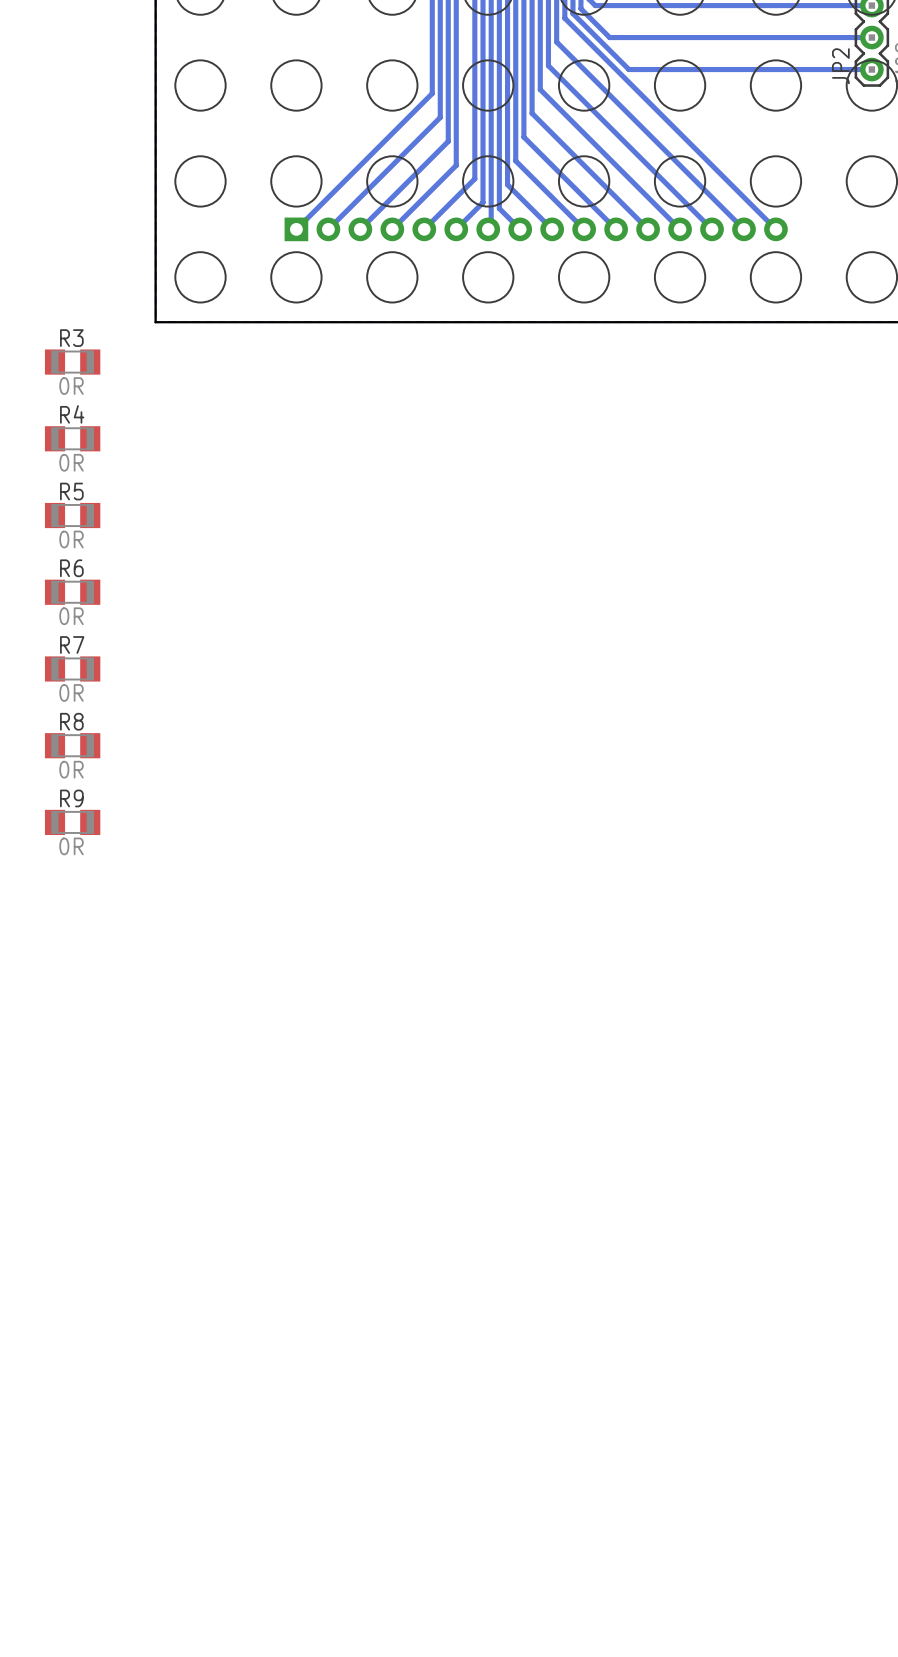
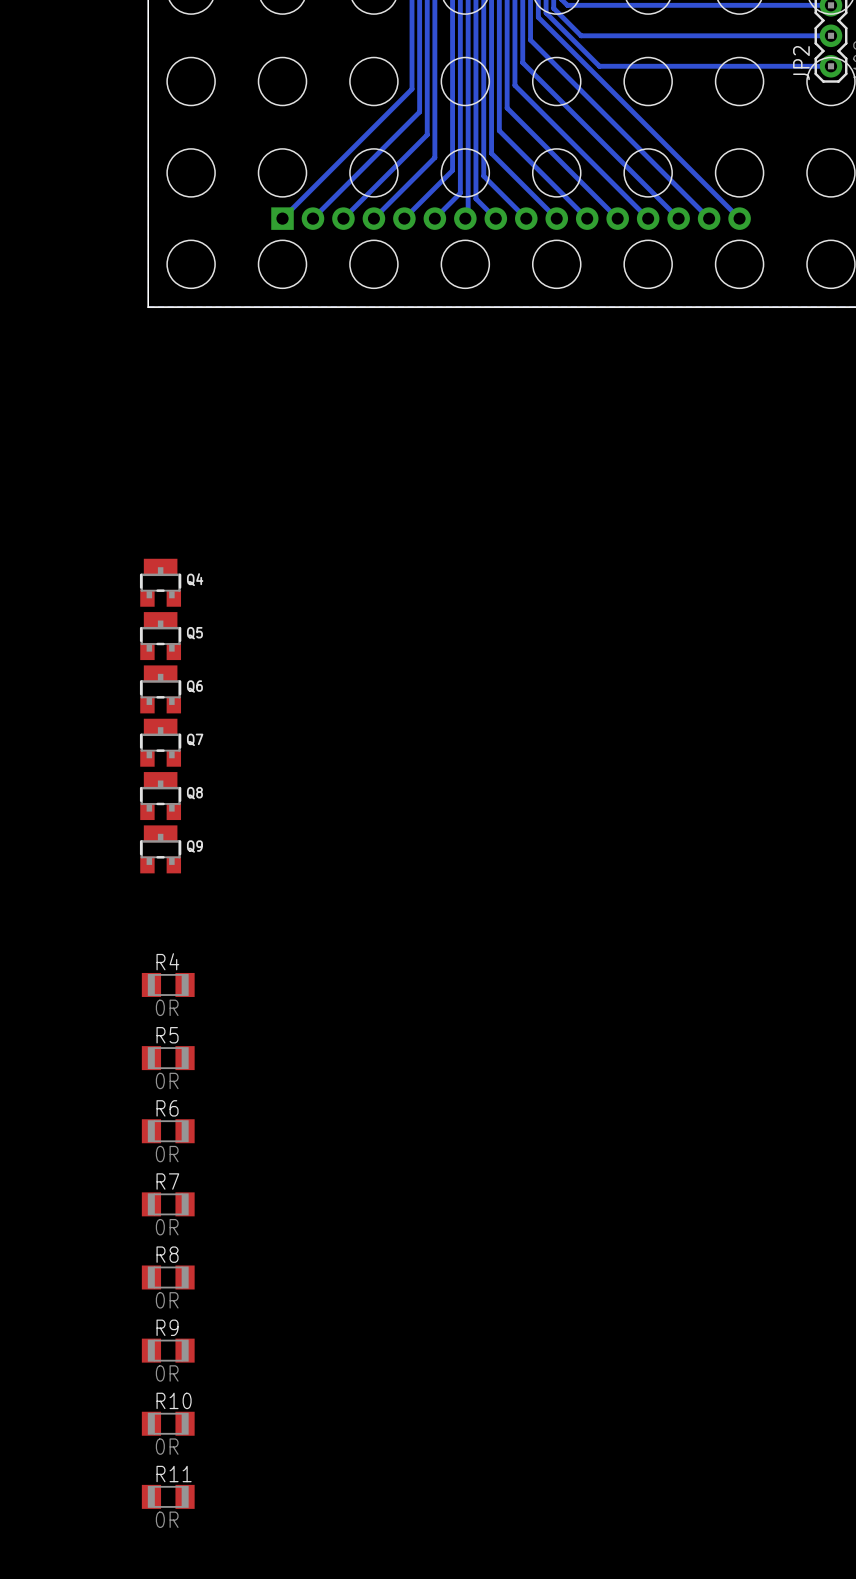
R3: 0R (72, 362) -> none
R4 position: (72, 438) -> (168, 984)
R5 position: (72, 515) -> (168, 1058)
R6 position: (72, 592) -> (168, 1131)
Q4: none -> (160, 582)
Q5: none -> (160, 636)
R7 position: (72, 668) -> (168, 1204)
Q6: none -> (160, 689)
R8 position: (72, 745) -> (168, 1277)
Q7: none -> (160, 742)
R9 position: (72, 822) -> (168, 1350)
Q8: none -> (160, 796)
Q9: none -> (160, 849)
R10: none -> 0R (168, 1423)
R11: none -> 0R (168, 1496)

